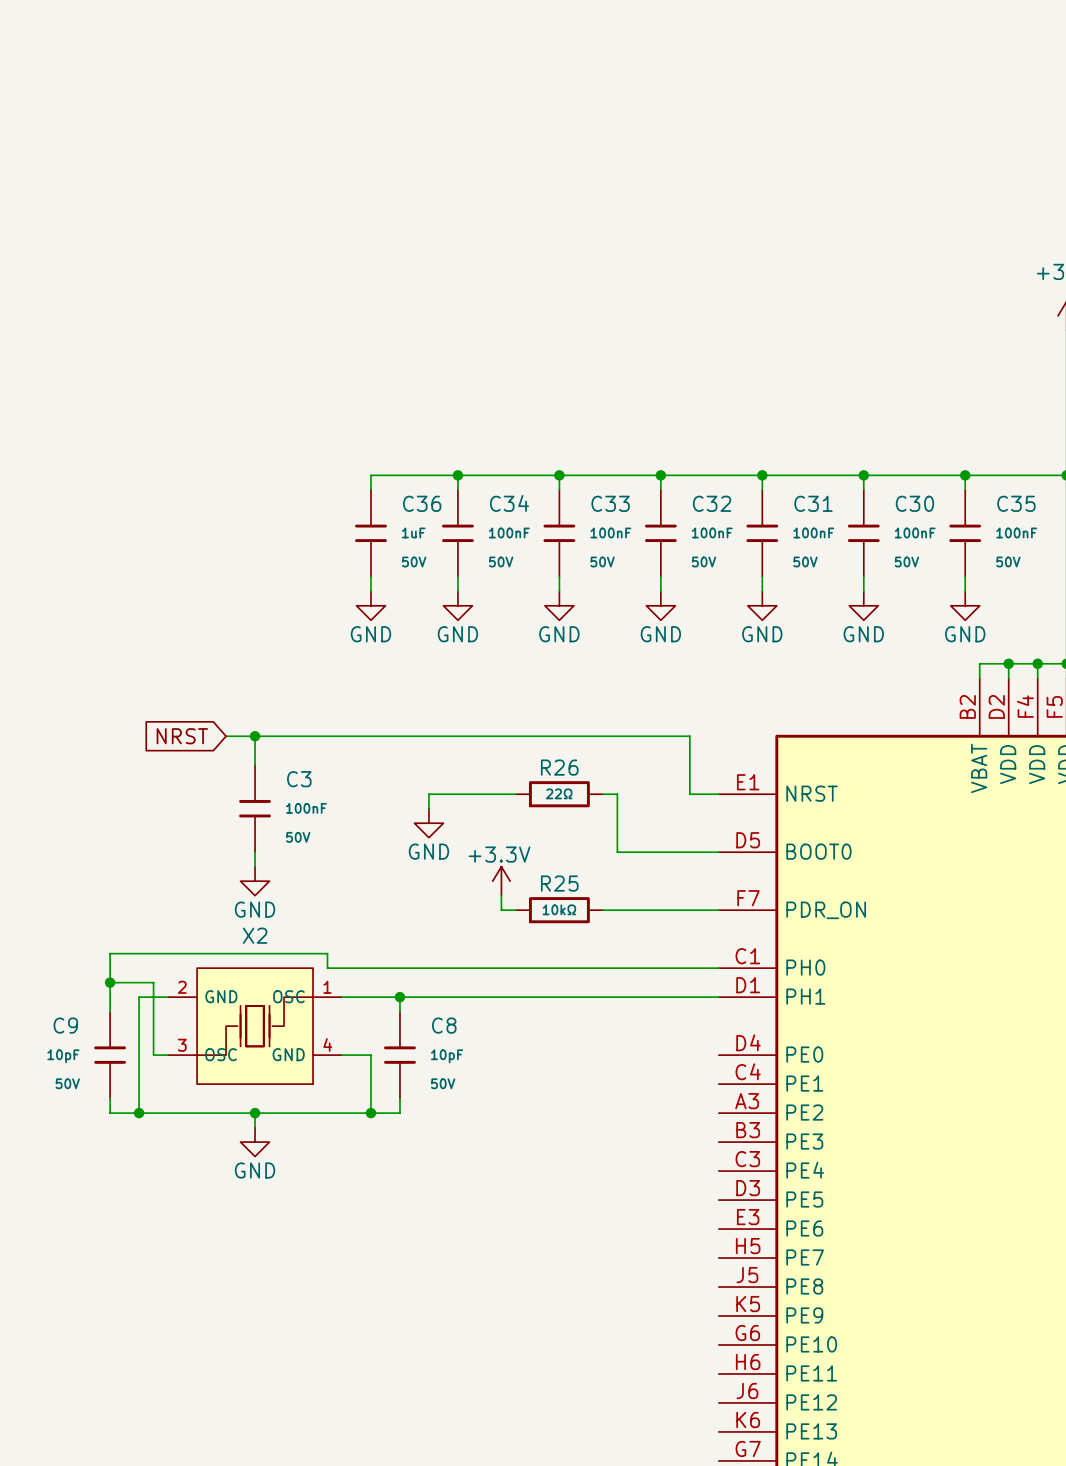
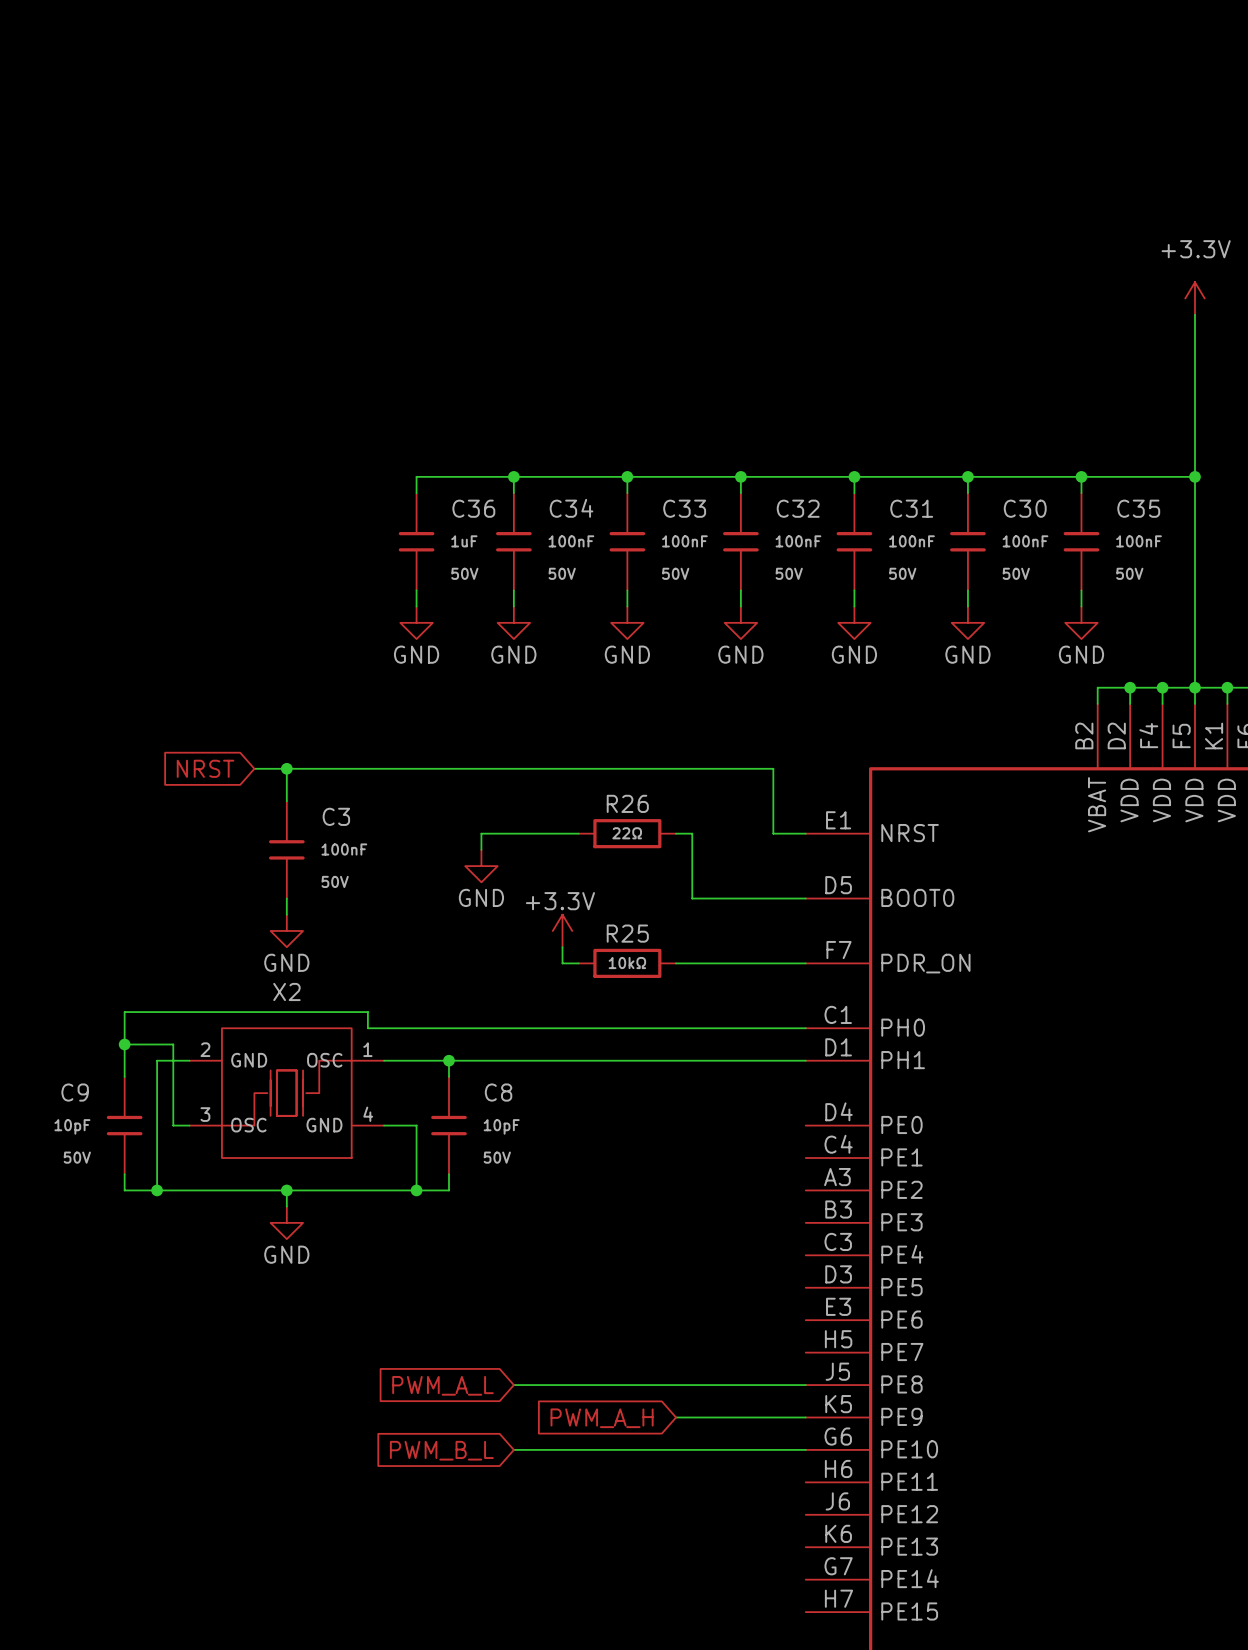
global label: none -> PWM_A_L (442, 1385)
wire: none -> (513, 1385) (805, 1385)
global label: none -> PWM_A_H (602, 1418)
wire: none -> (676, 1417) (805, 1417)
wire: none -> (513, 1449) (805, 1449)
global label: none -> PWM_B_L (441, 1450)

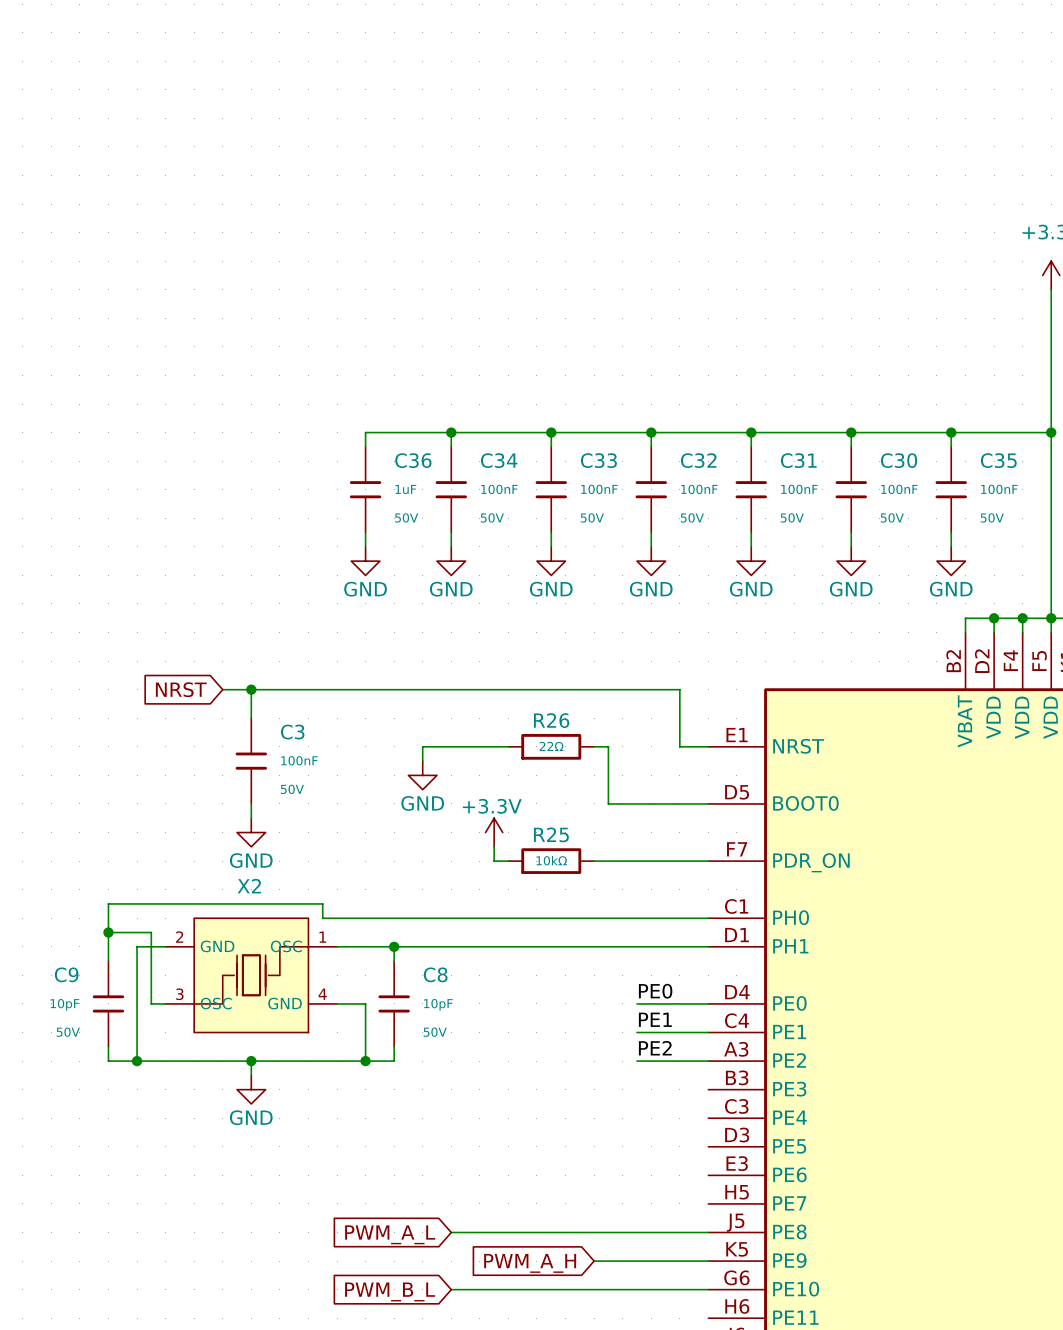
label: none -> PE0 (655, 991)
wire: none -> (636, 1003) (708, 1003)
label: none -> PE1 (655, 1019)
wire: none -> (636, 1032) (708, 1032)
label: none -> PE2 (655, 1048)
wire: none -> (636, 1061) (708, 1061)

